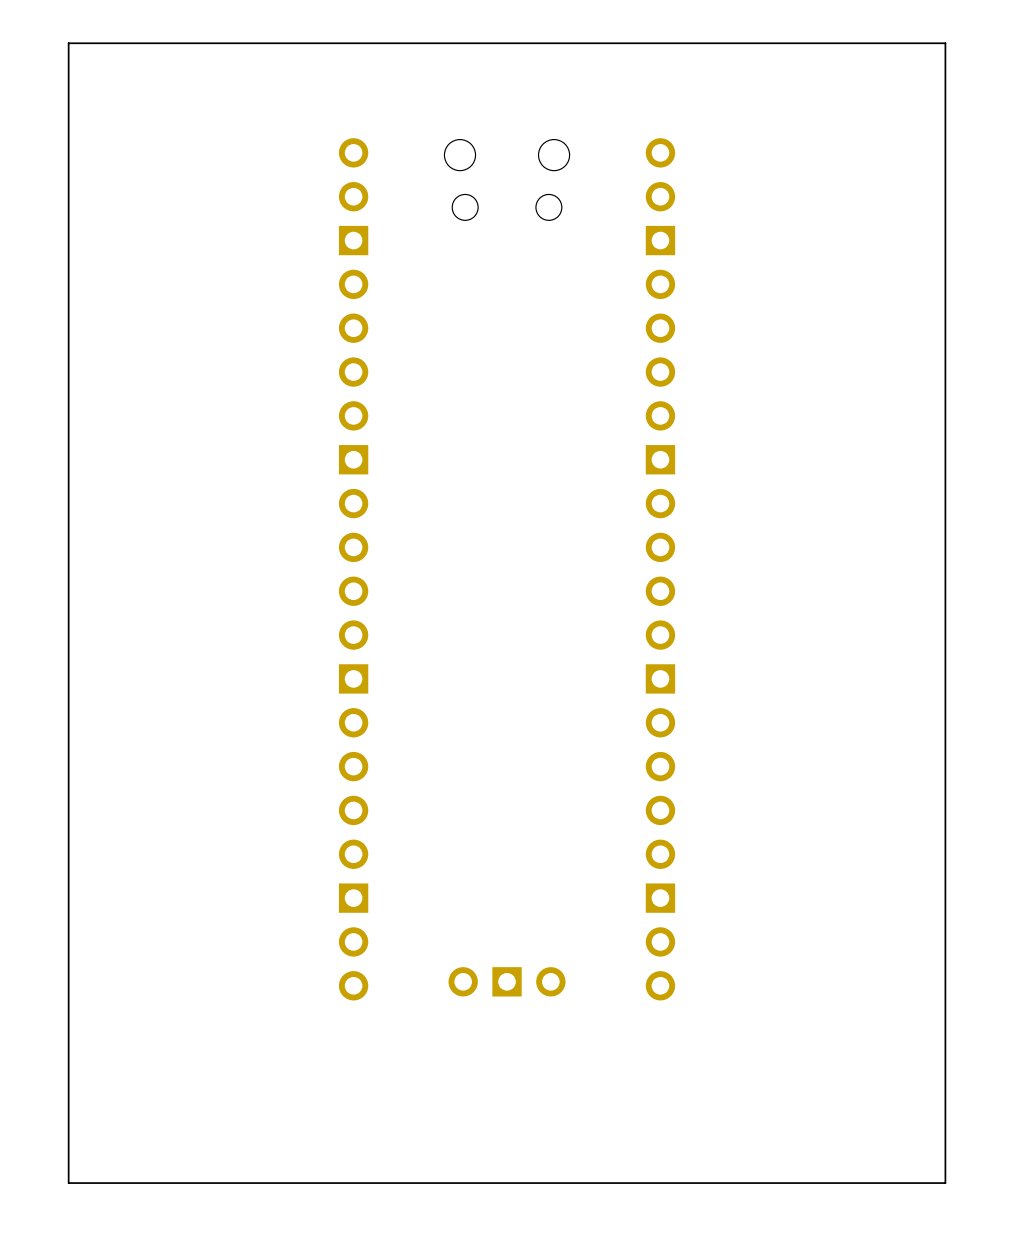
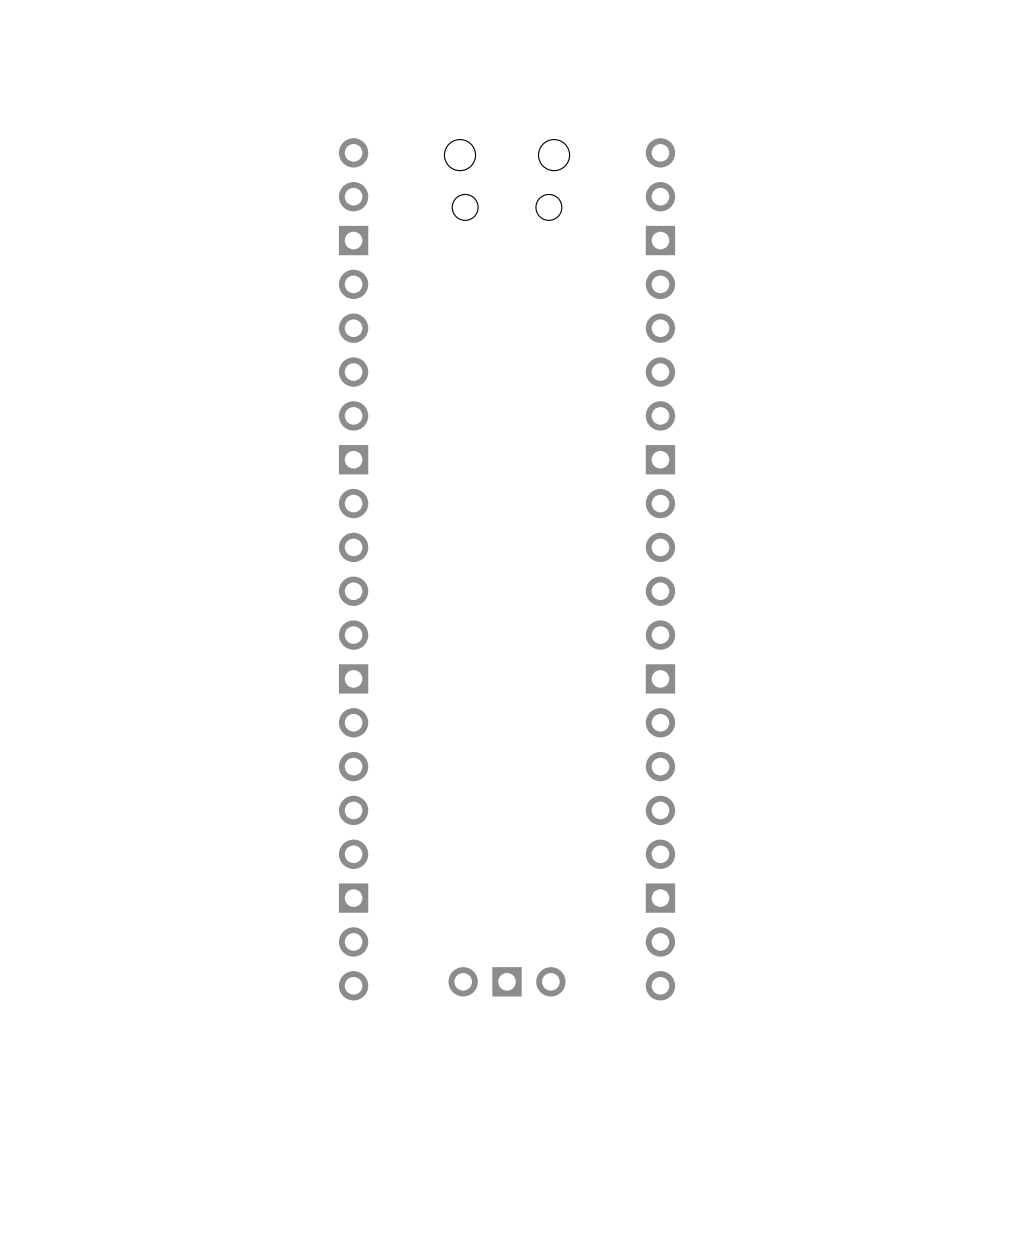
board edge: (945, 43) (945, 1183) (68, 1183) (68, 43) (945, 43) -> none

